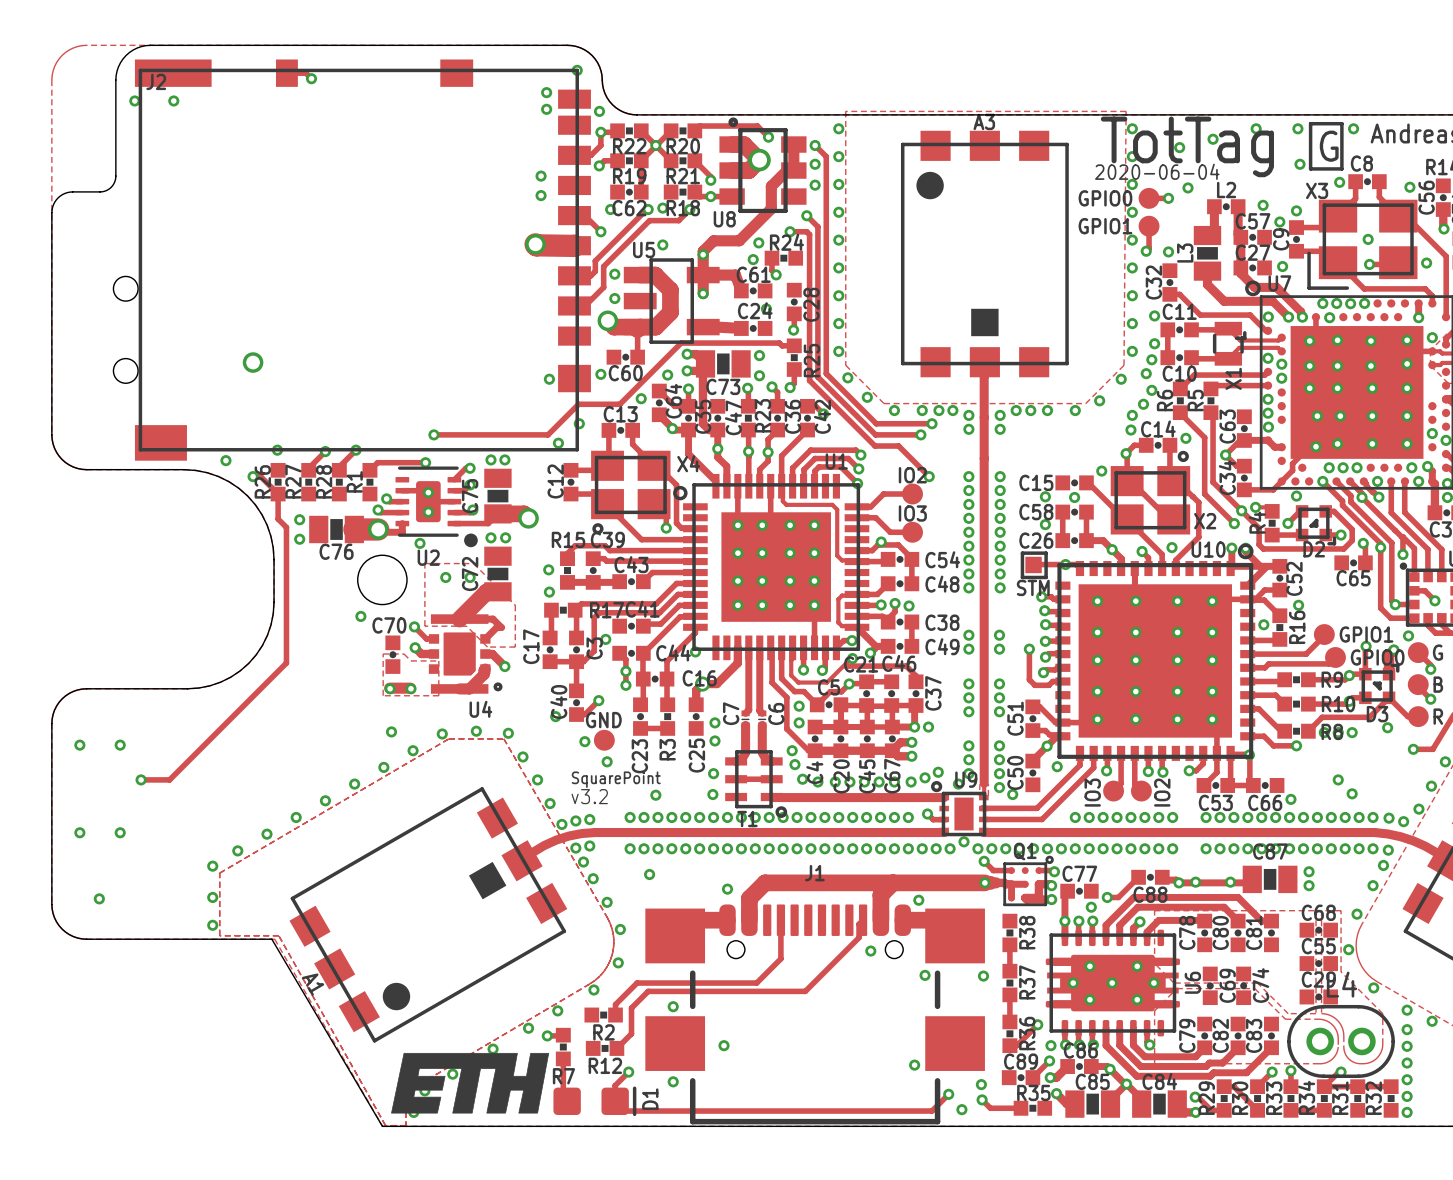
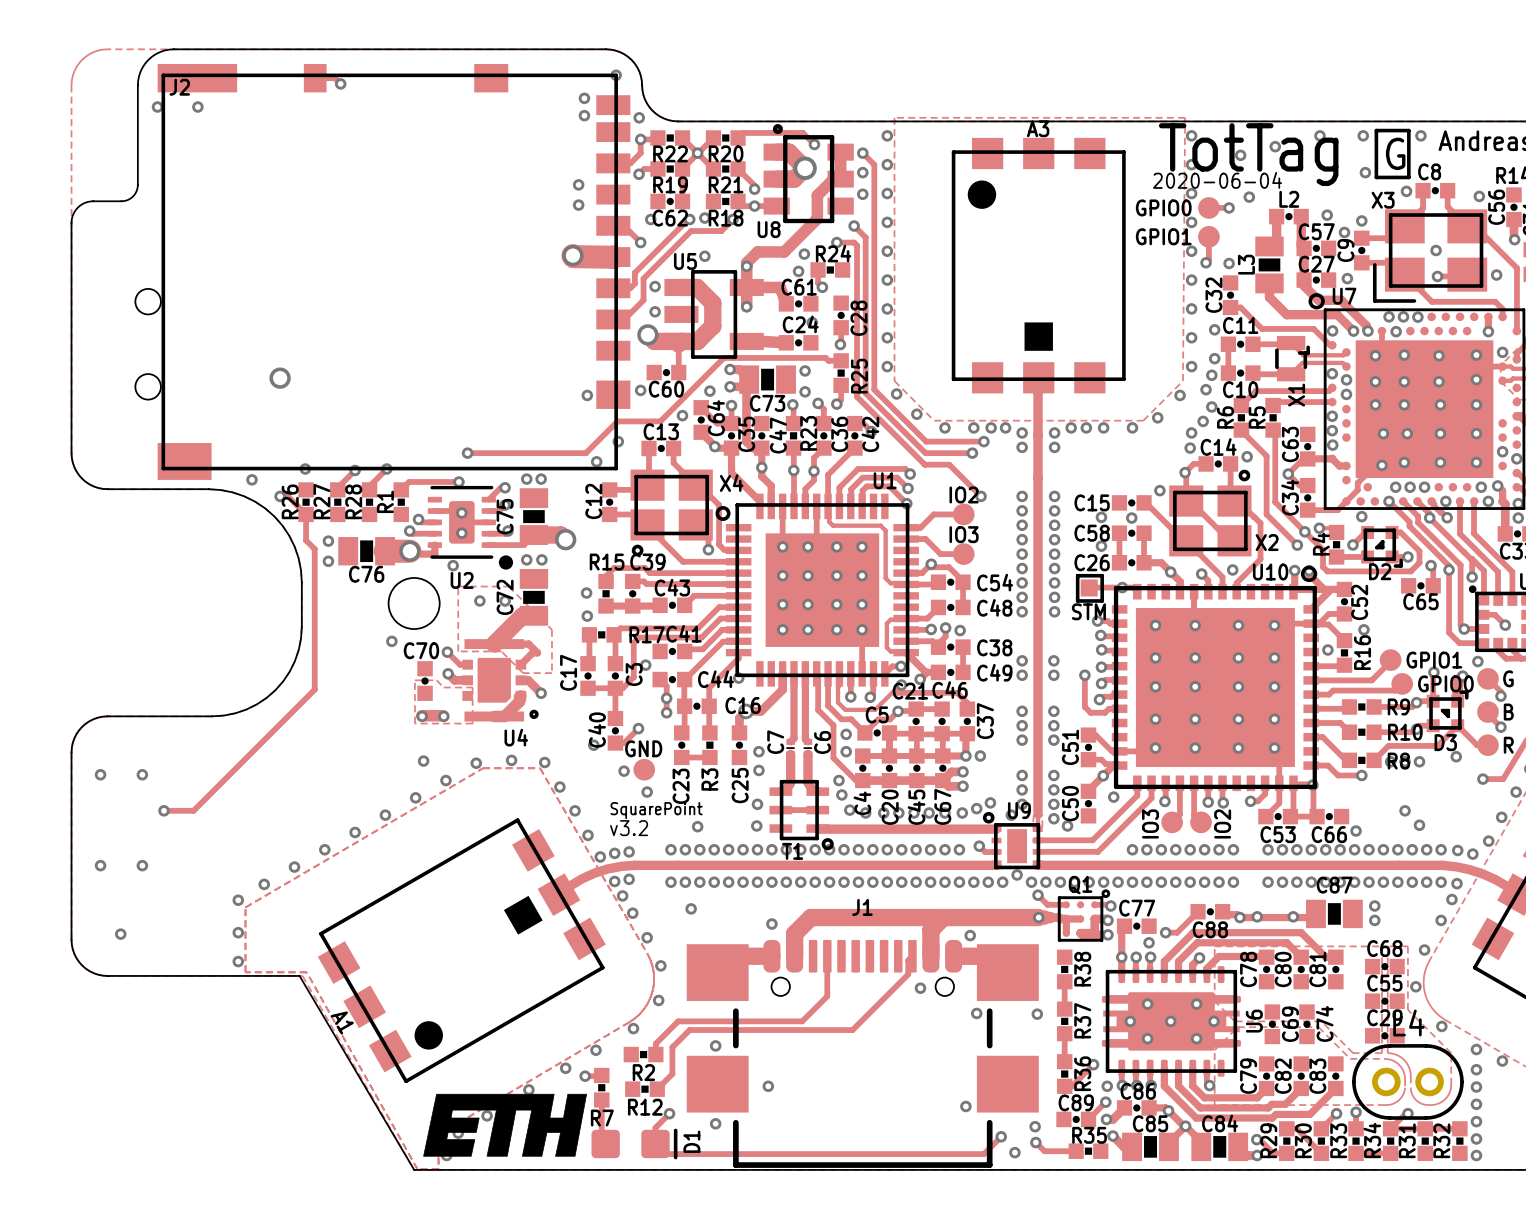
via: (1364, 303) -> none

